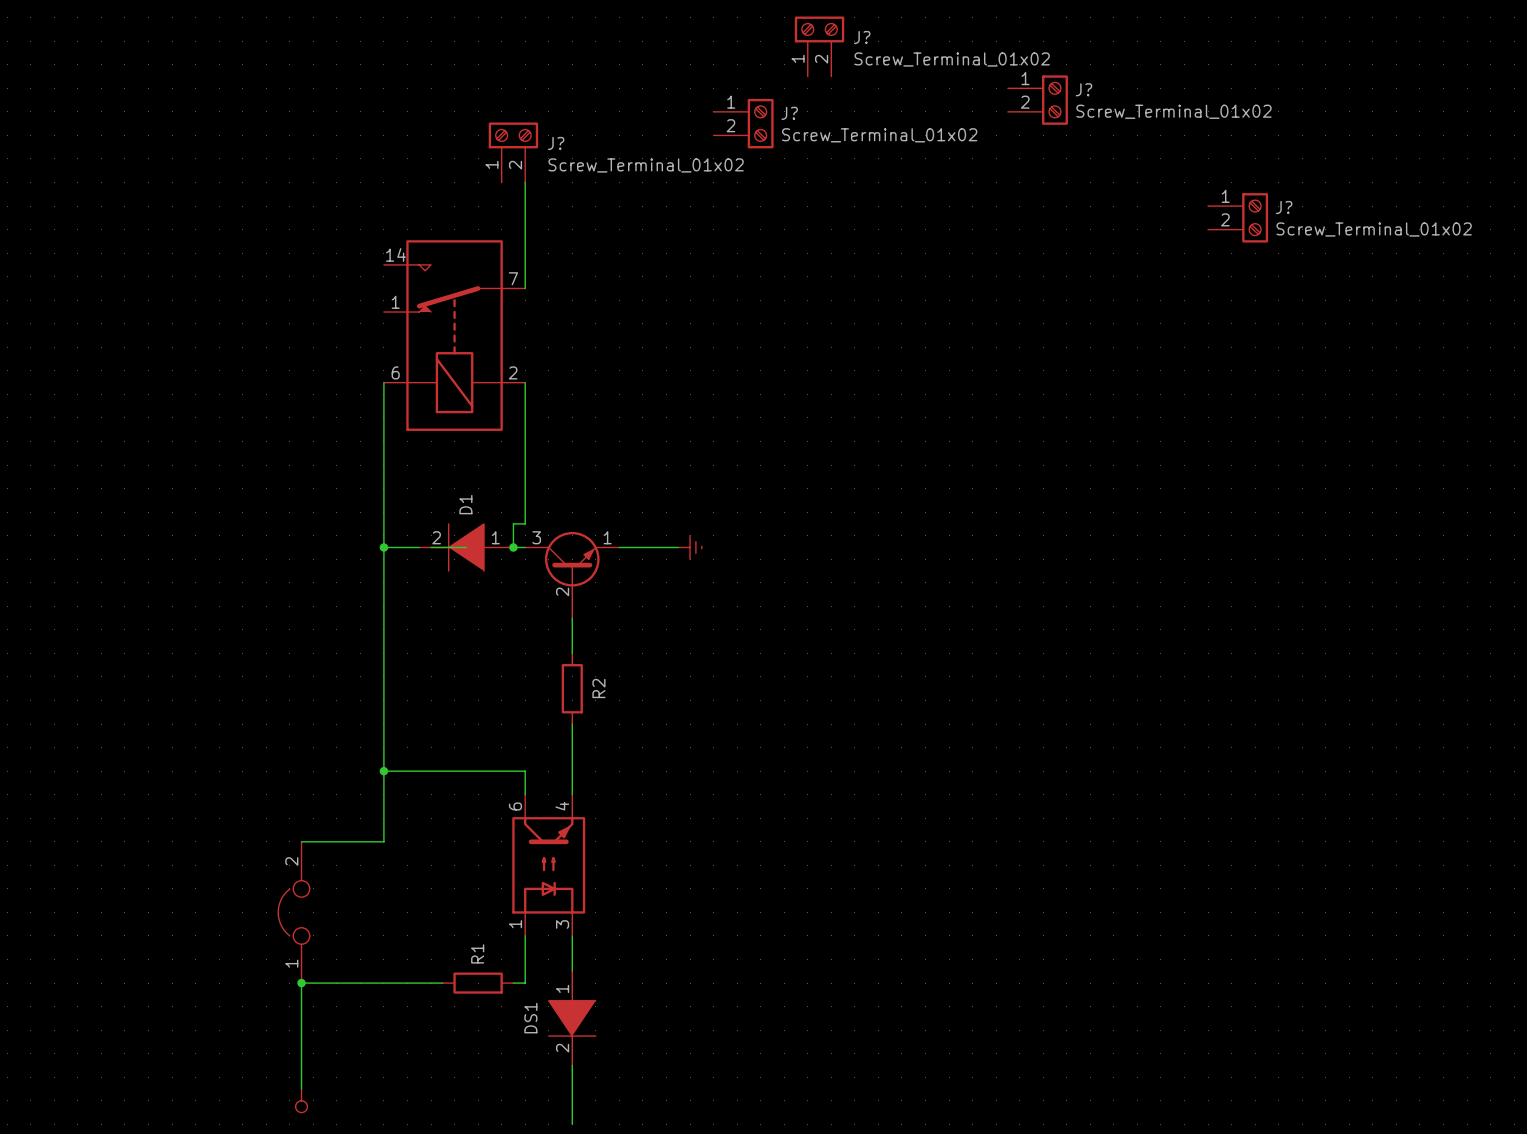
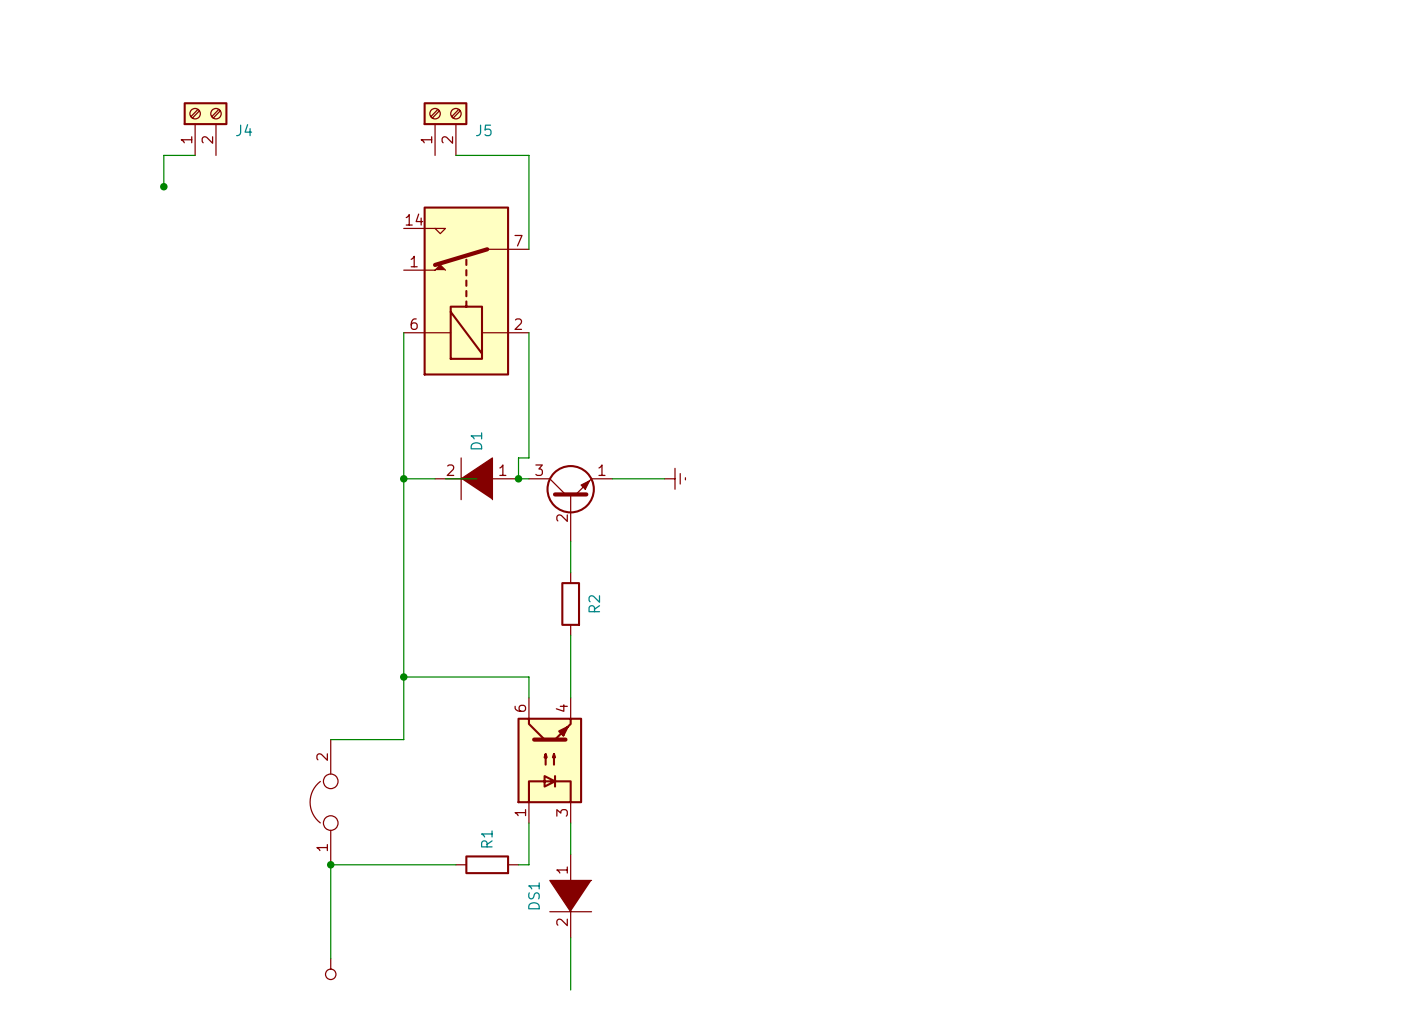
J?: Screw_Terminal_01x02 (819, 46) -> none
J?: Screw_Terminal_01x02 (1037, 100) -> none
J?: Screw_Terminal_01x02 (743, 123) -> none
J4: none -> (205, 128)
J5: none -> (445, 128)
J?: Screw_Terminal_01x02 (513, 152) -> none
wire: none -> (195, 155) (163, 155) (163, 186)
wire: none -> (455, 155) (528, 155)
junction: none -> (163, 186)
J?: Screw_Terminal_01x02 (1238, 217) -> none

